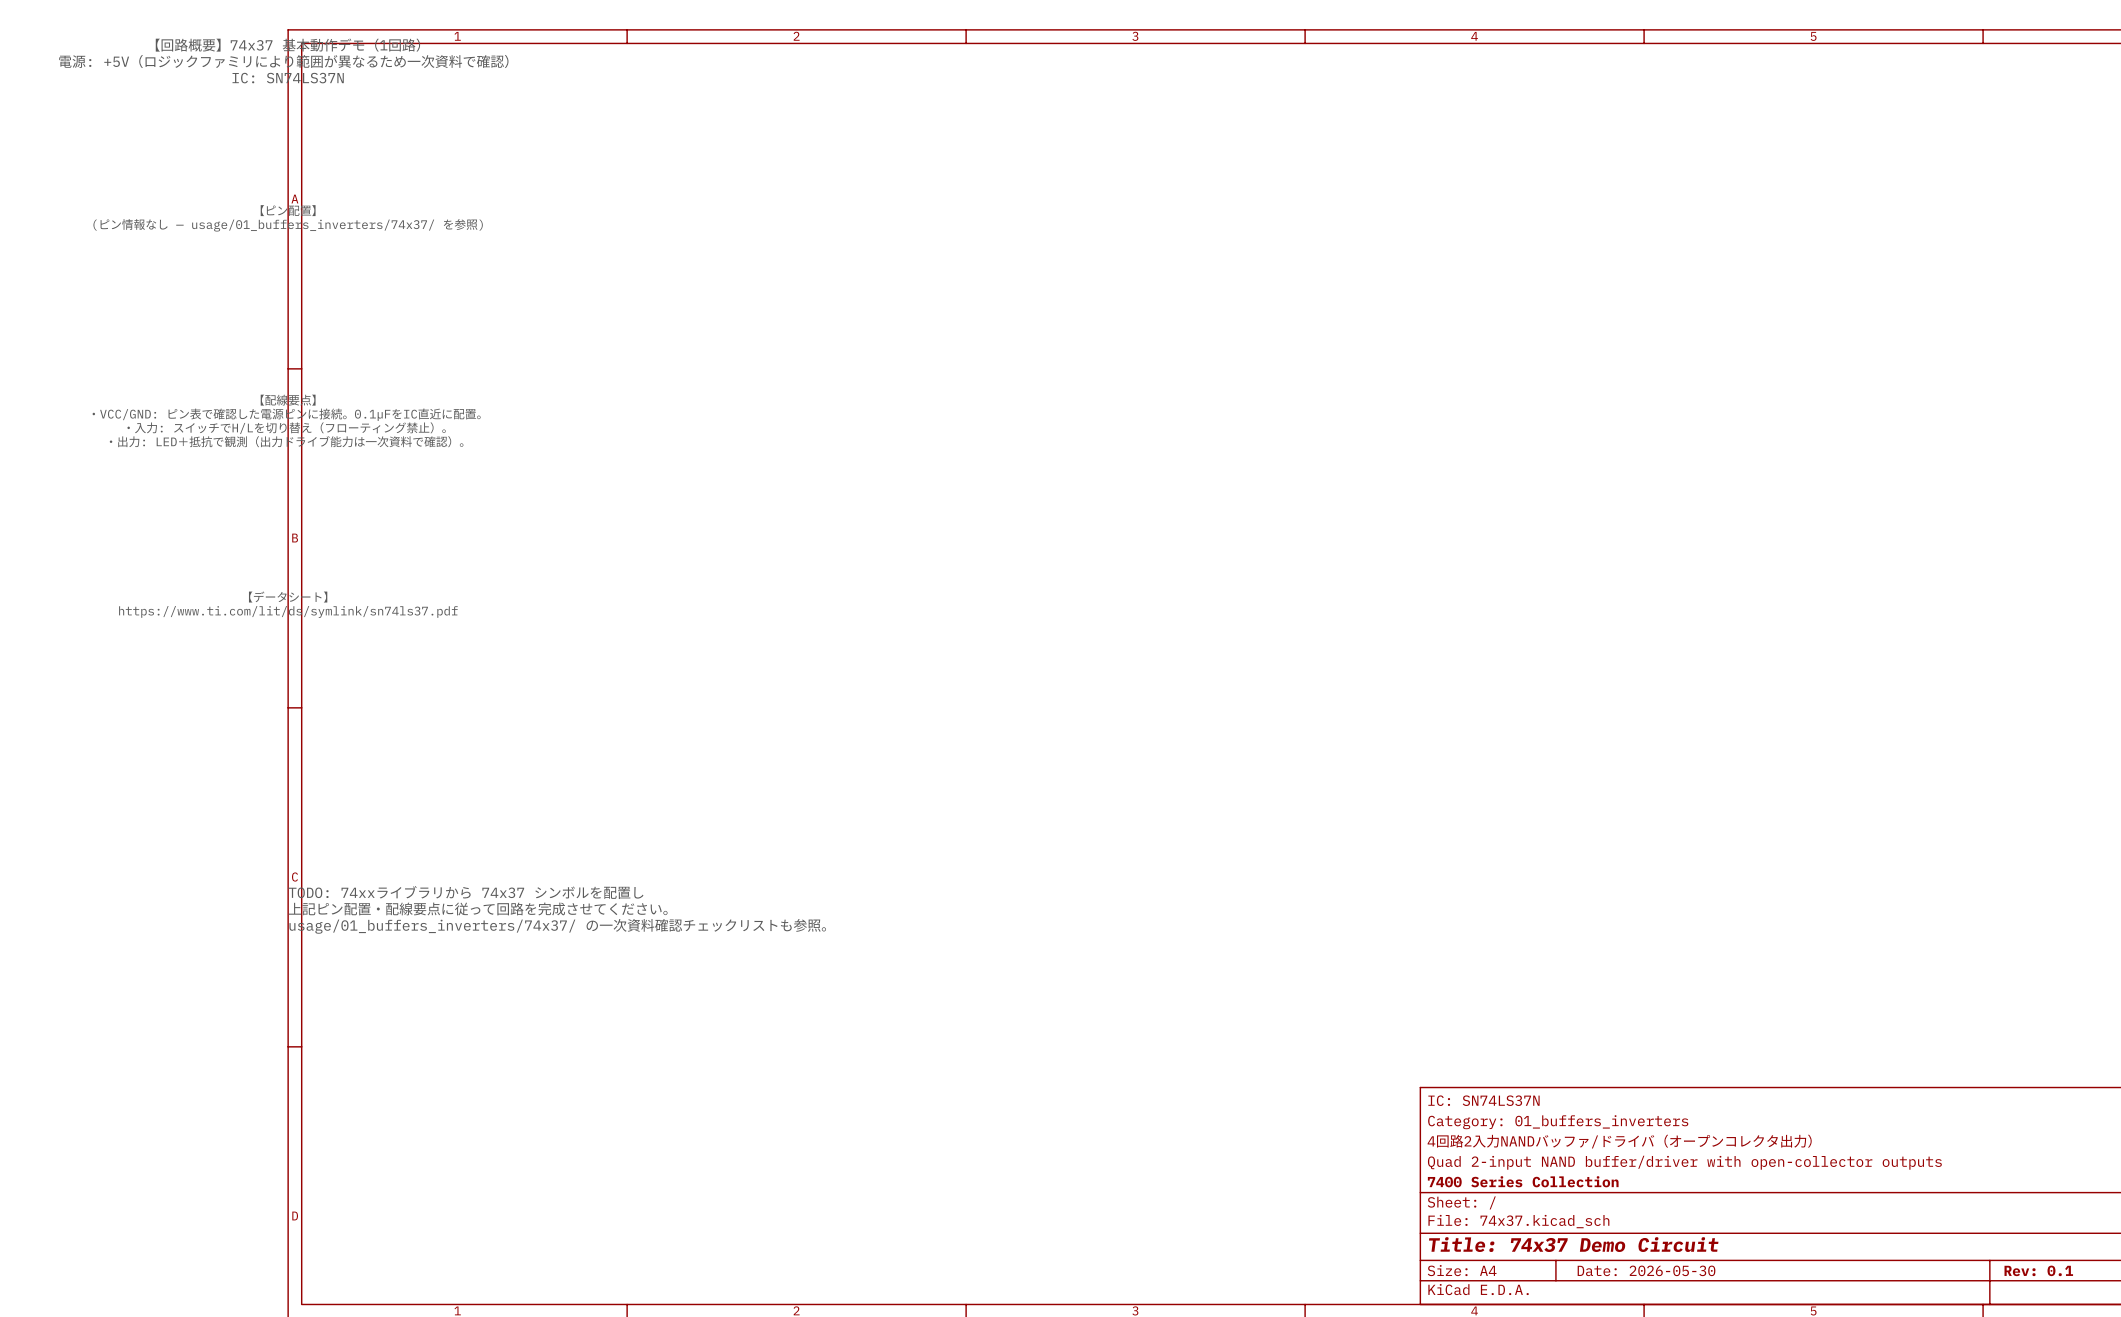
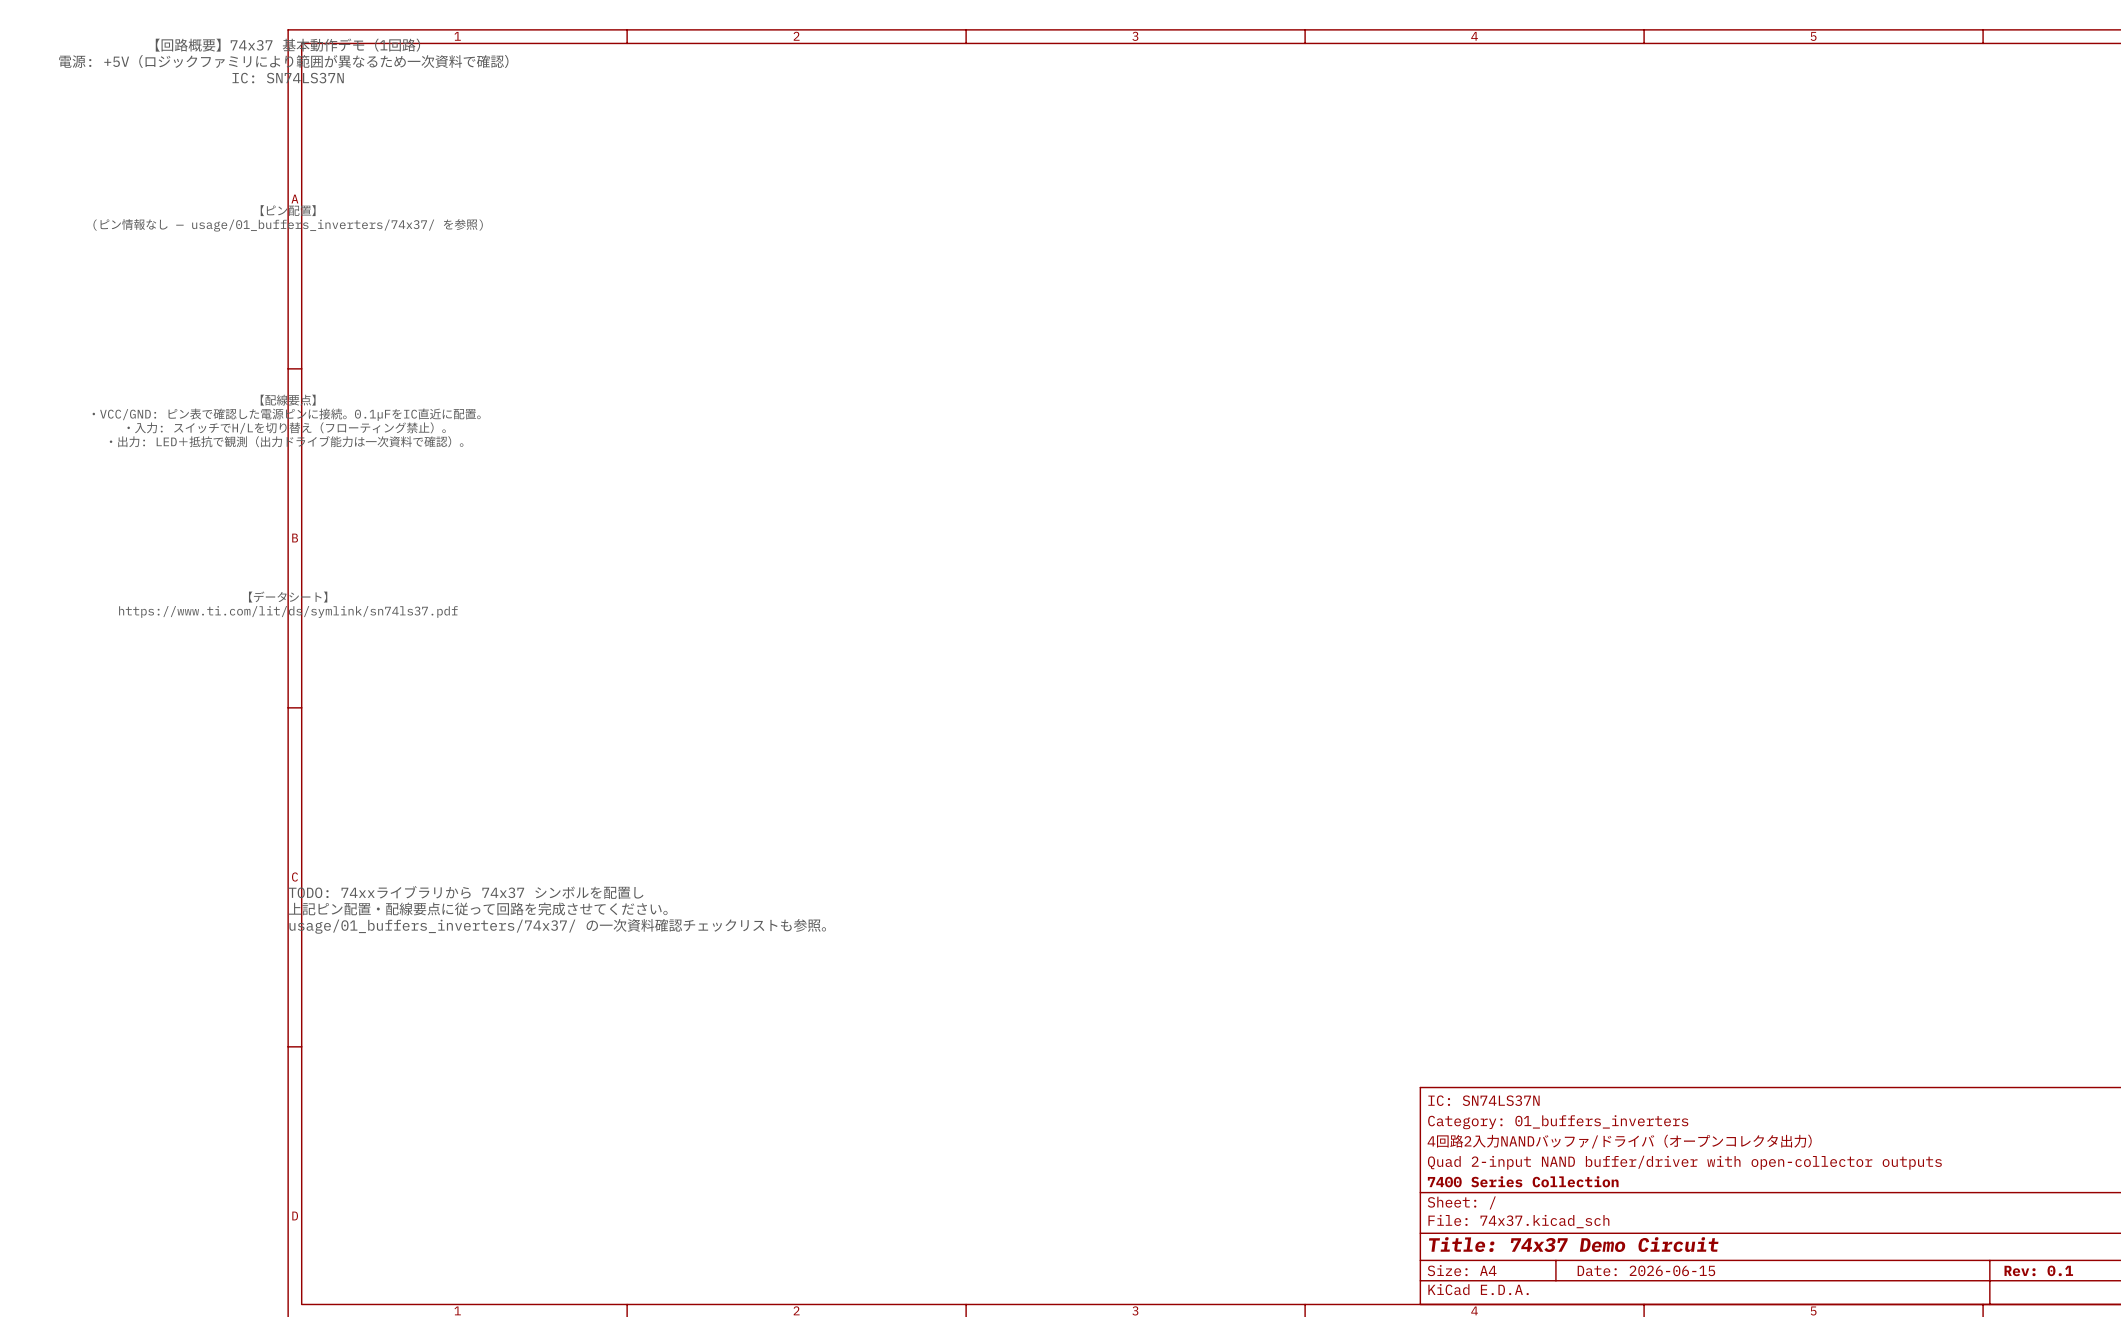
title block: Date: 2026-05-30 (1646, 1270) -> Date: 2026-06-15 (1646, 1270)

